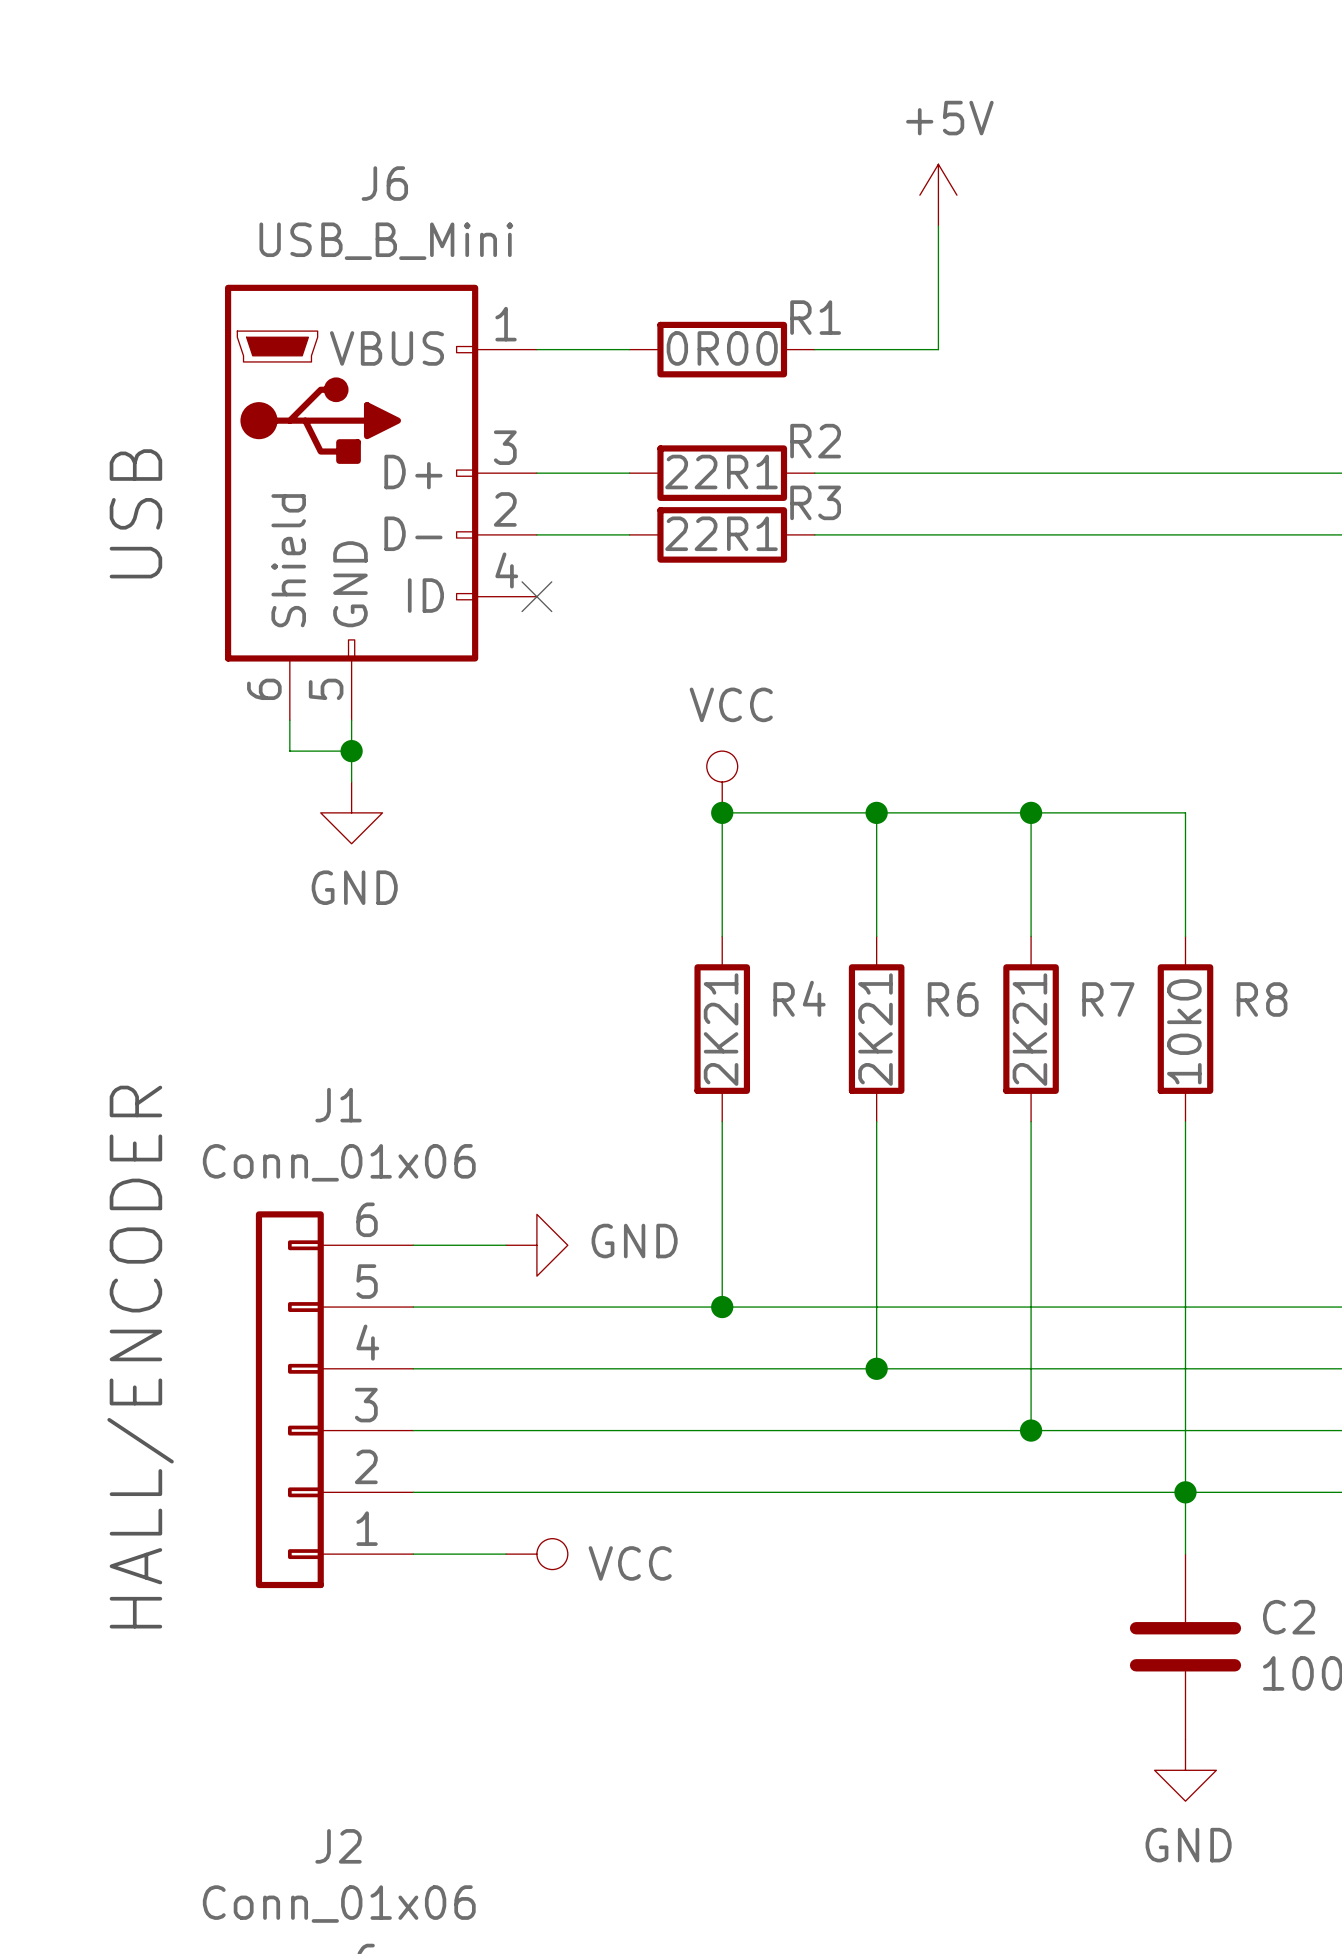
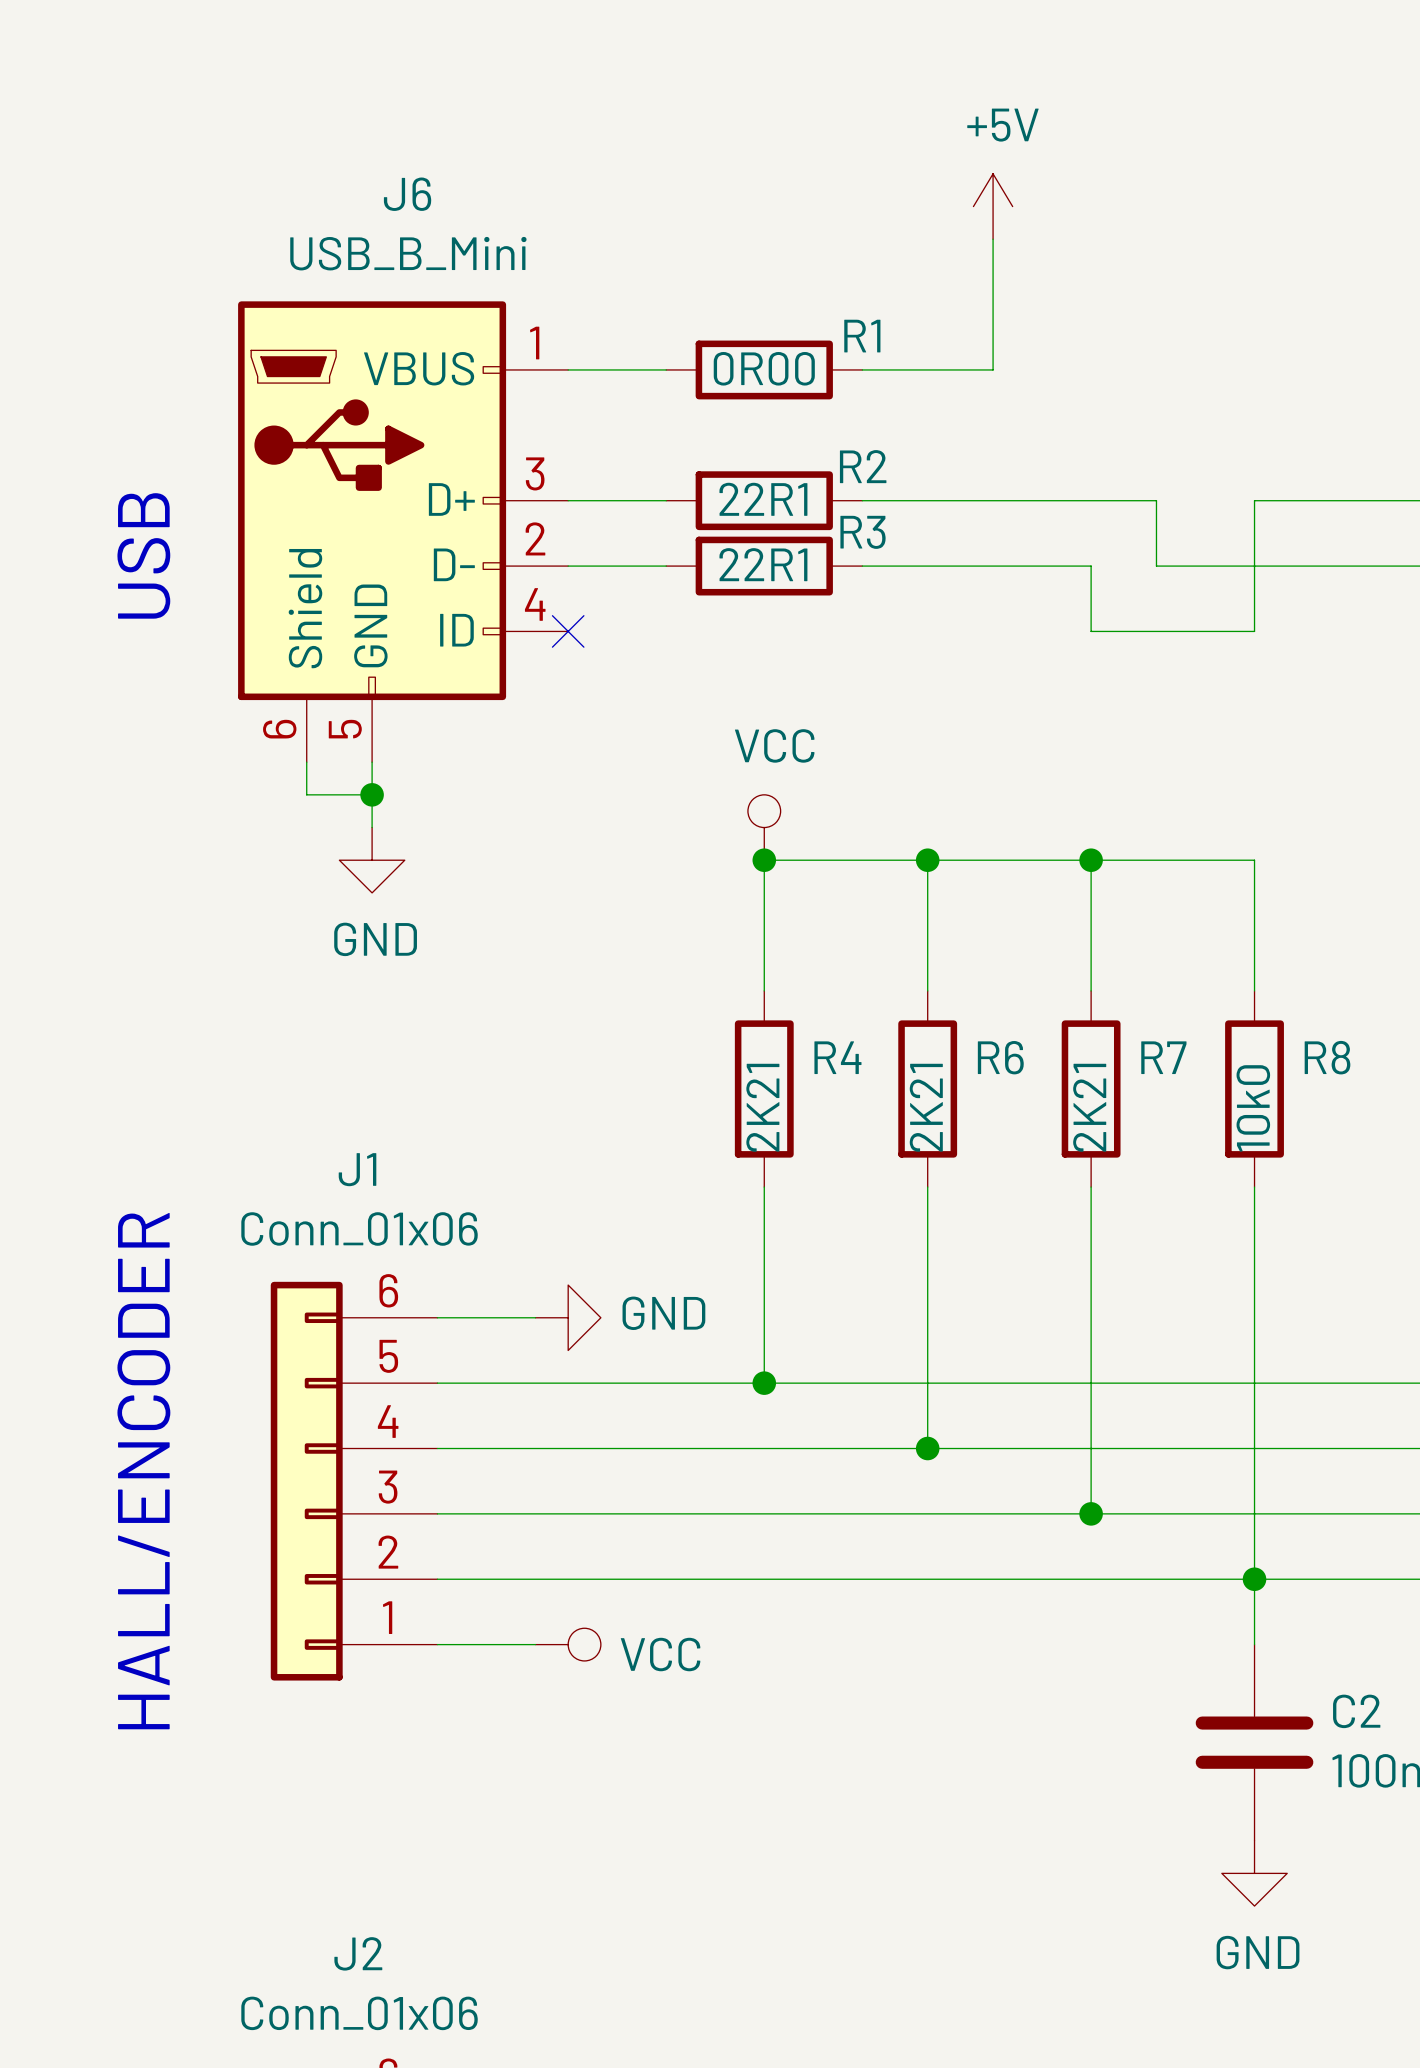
wire: (1092, 473) (1185, 473) -> (1091, 566) (1091, 631) (1254, 631) (1254, 500)
wire: (1031, 534) (1092, 534) -> (1156, 500) (1156, 566)

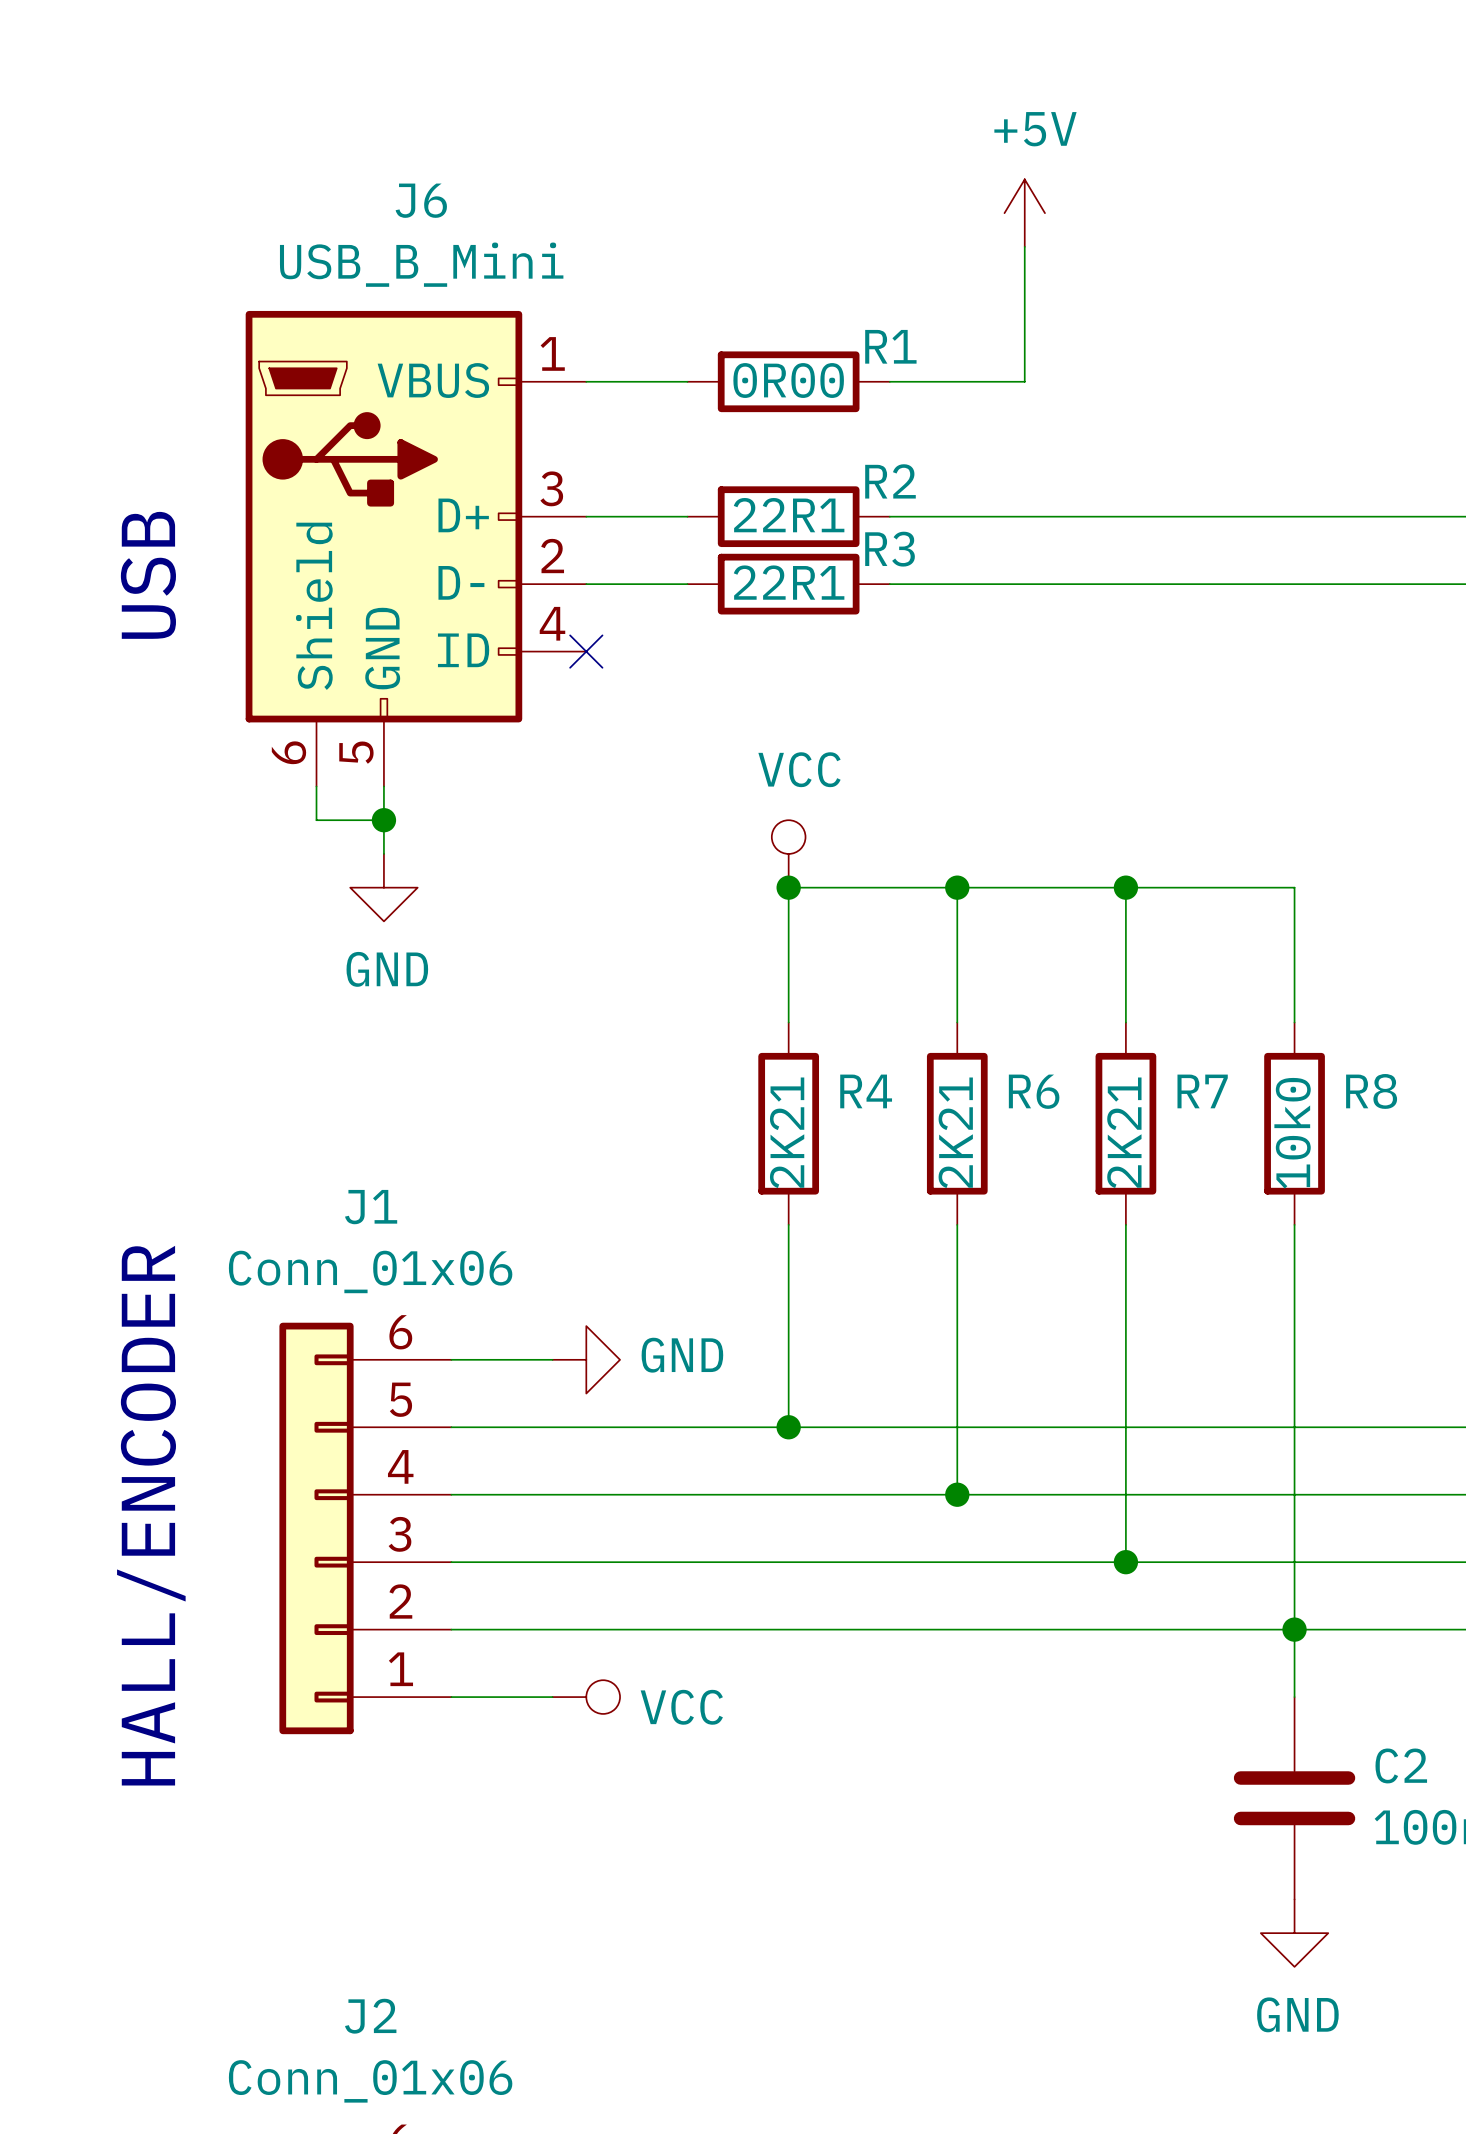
wire: (1156, 500) (1156, 566) -> (1125, 584) (1193, 584)
wire: (1254, 500) (1254, 631) (1091, 631) (1091, 566) -> (1294, 516) (1193, 516)

